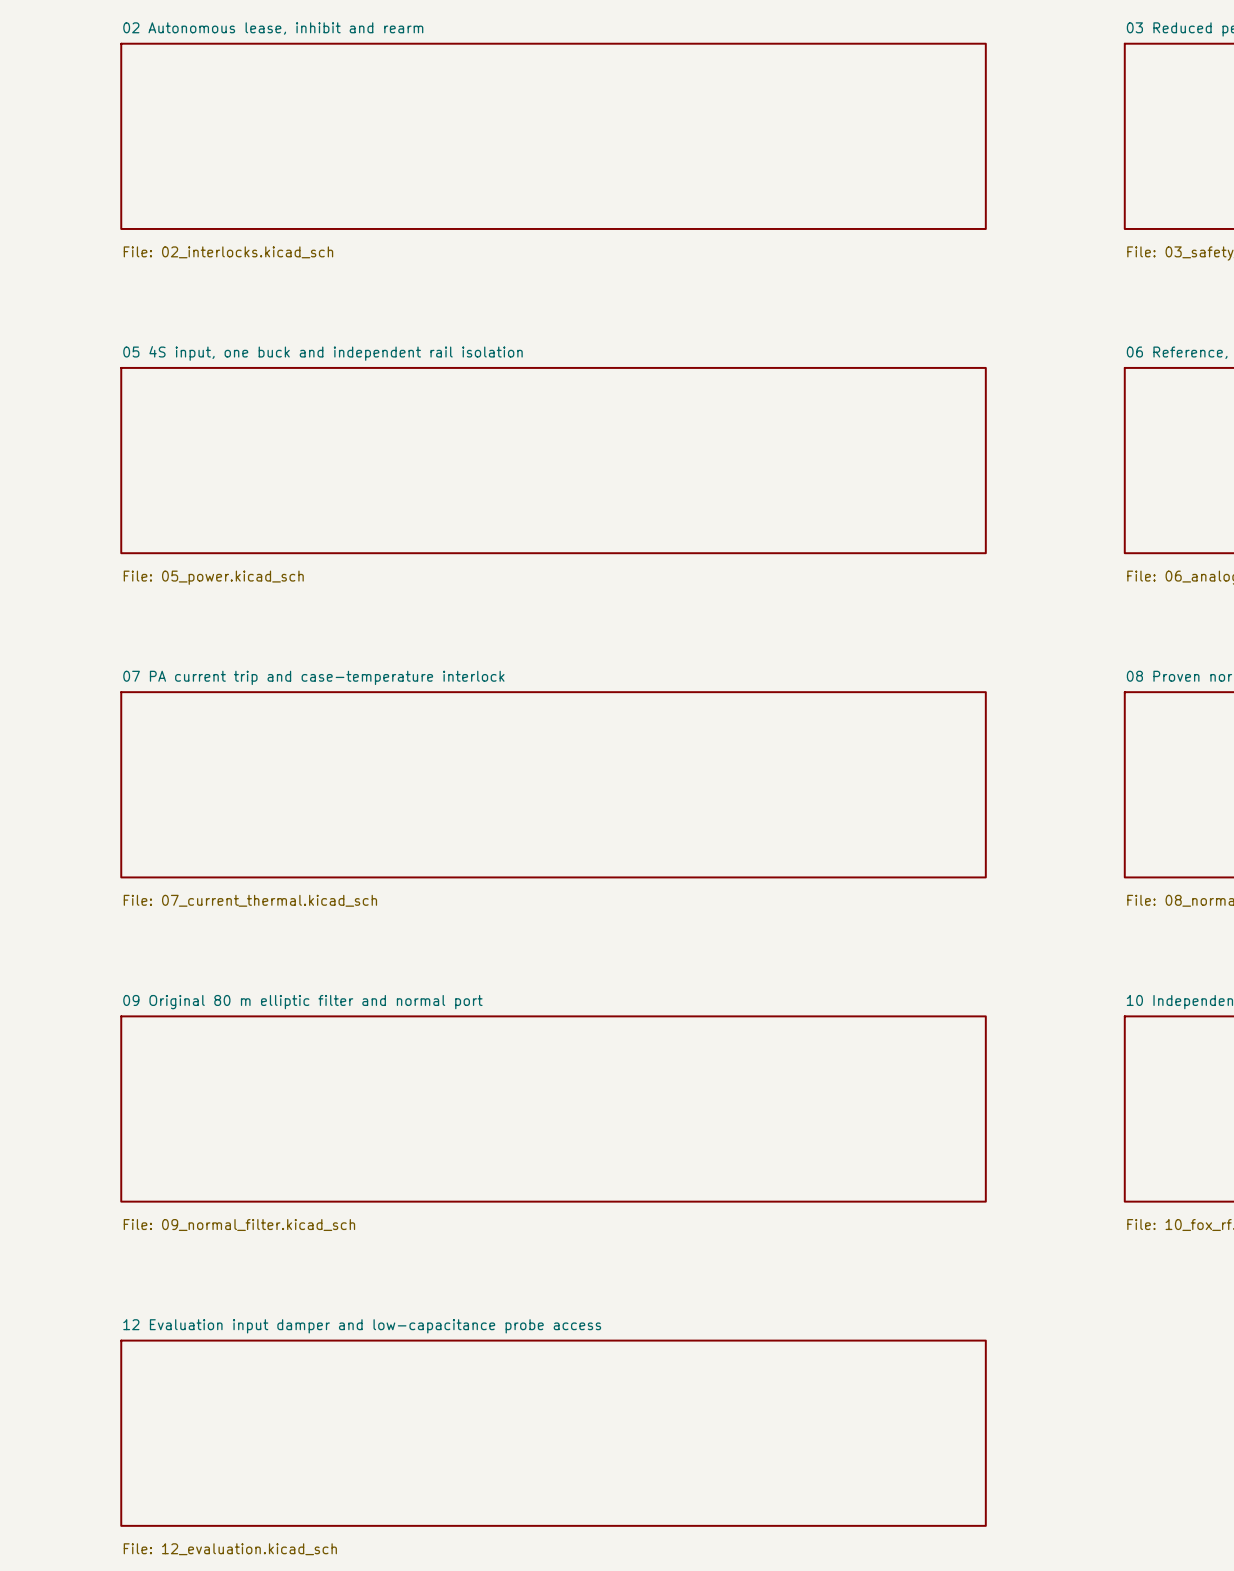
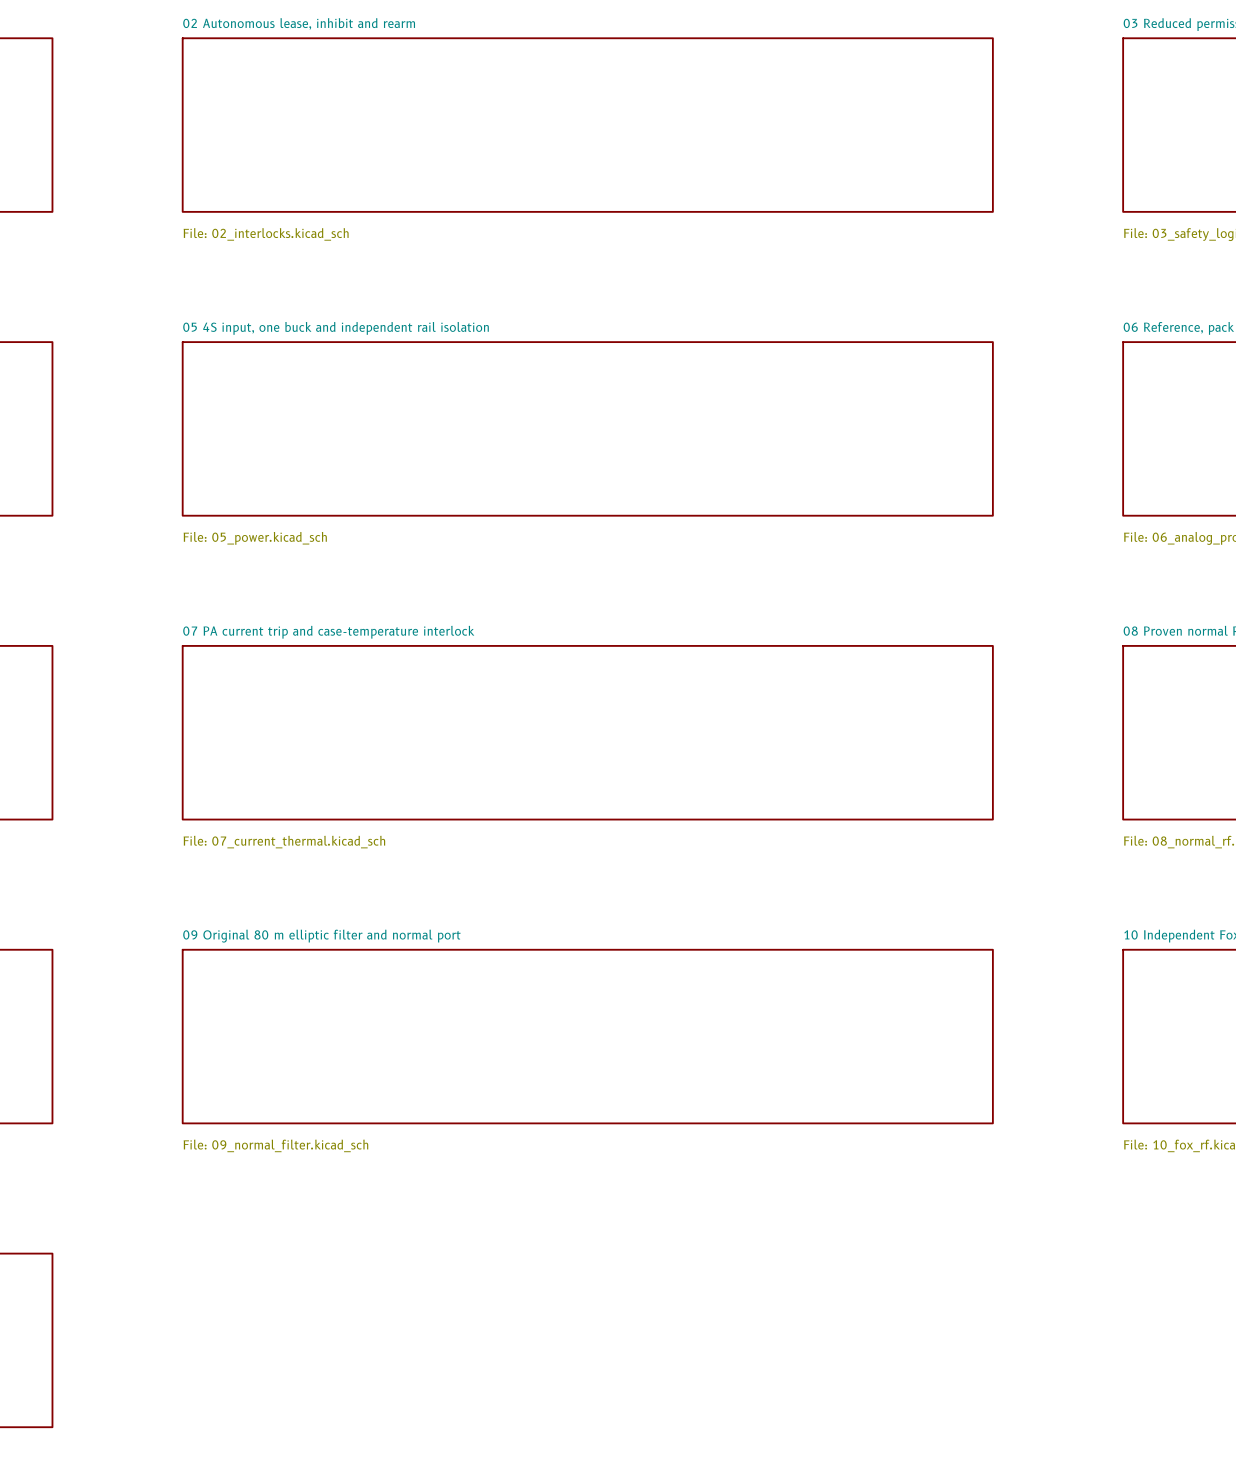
sheet 12 Evaluation input damper and low-capacitance probe access: File: 12_evaluation.kicad_sch (553, 1433) -> none

